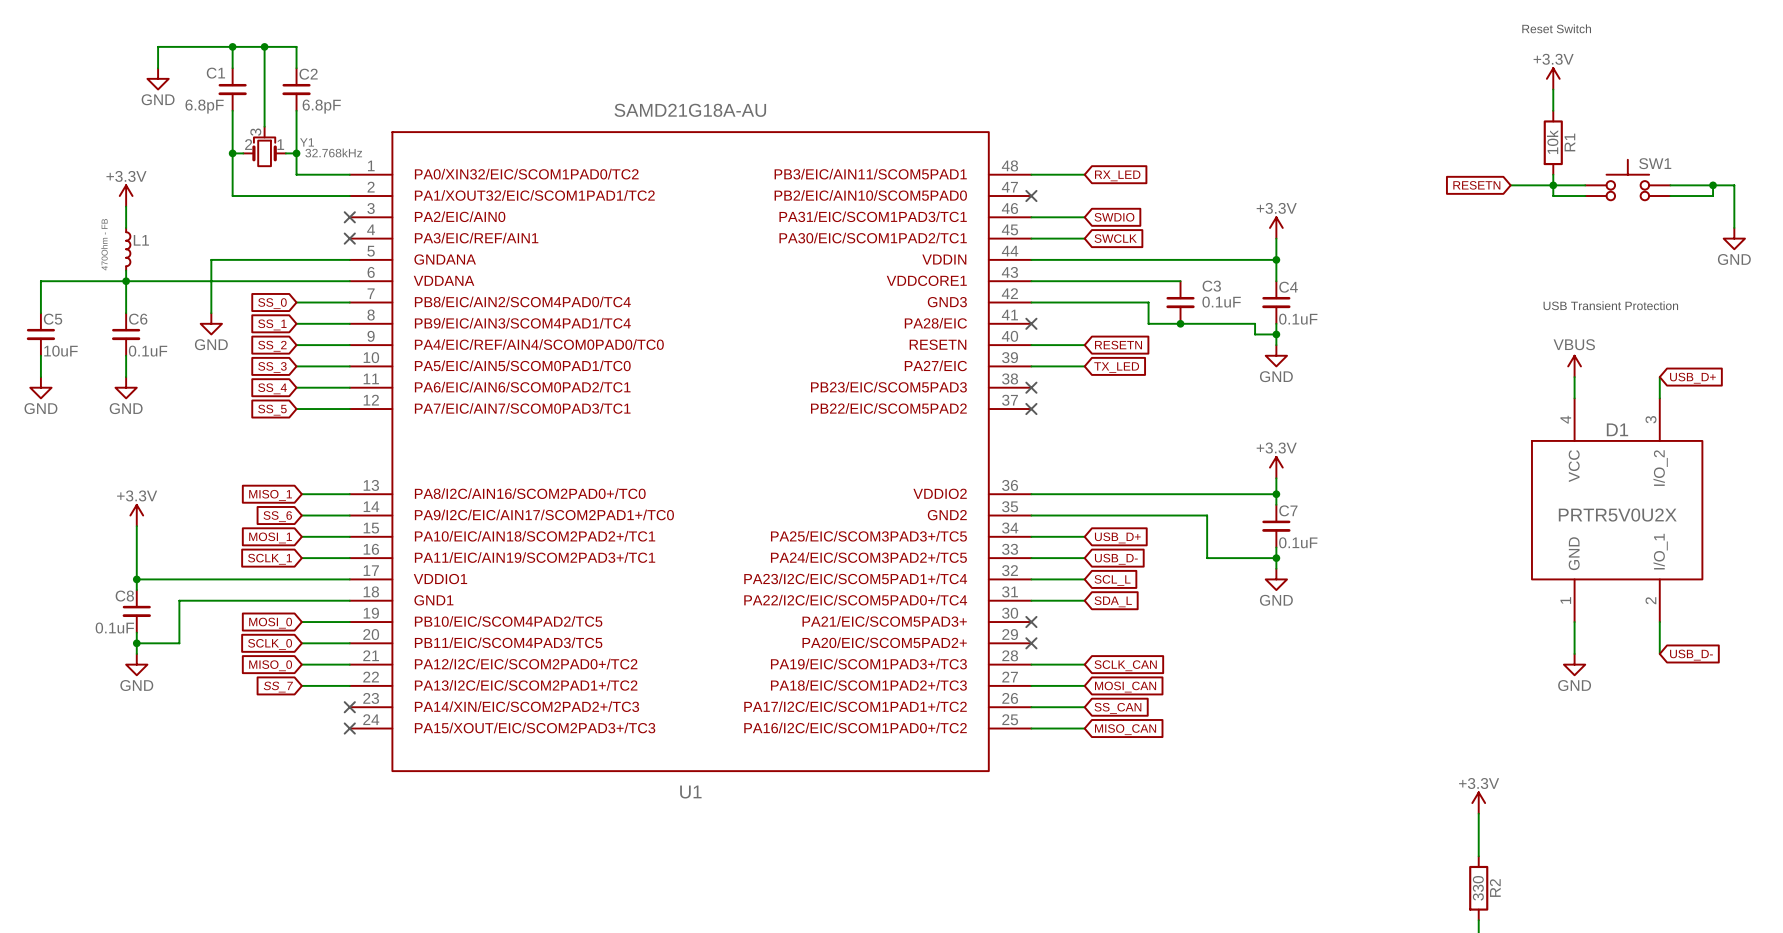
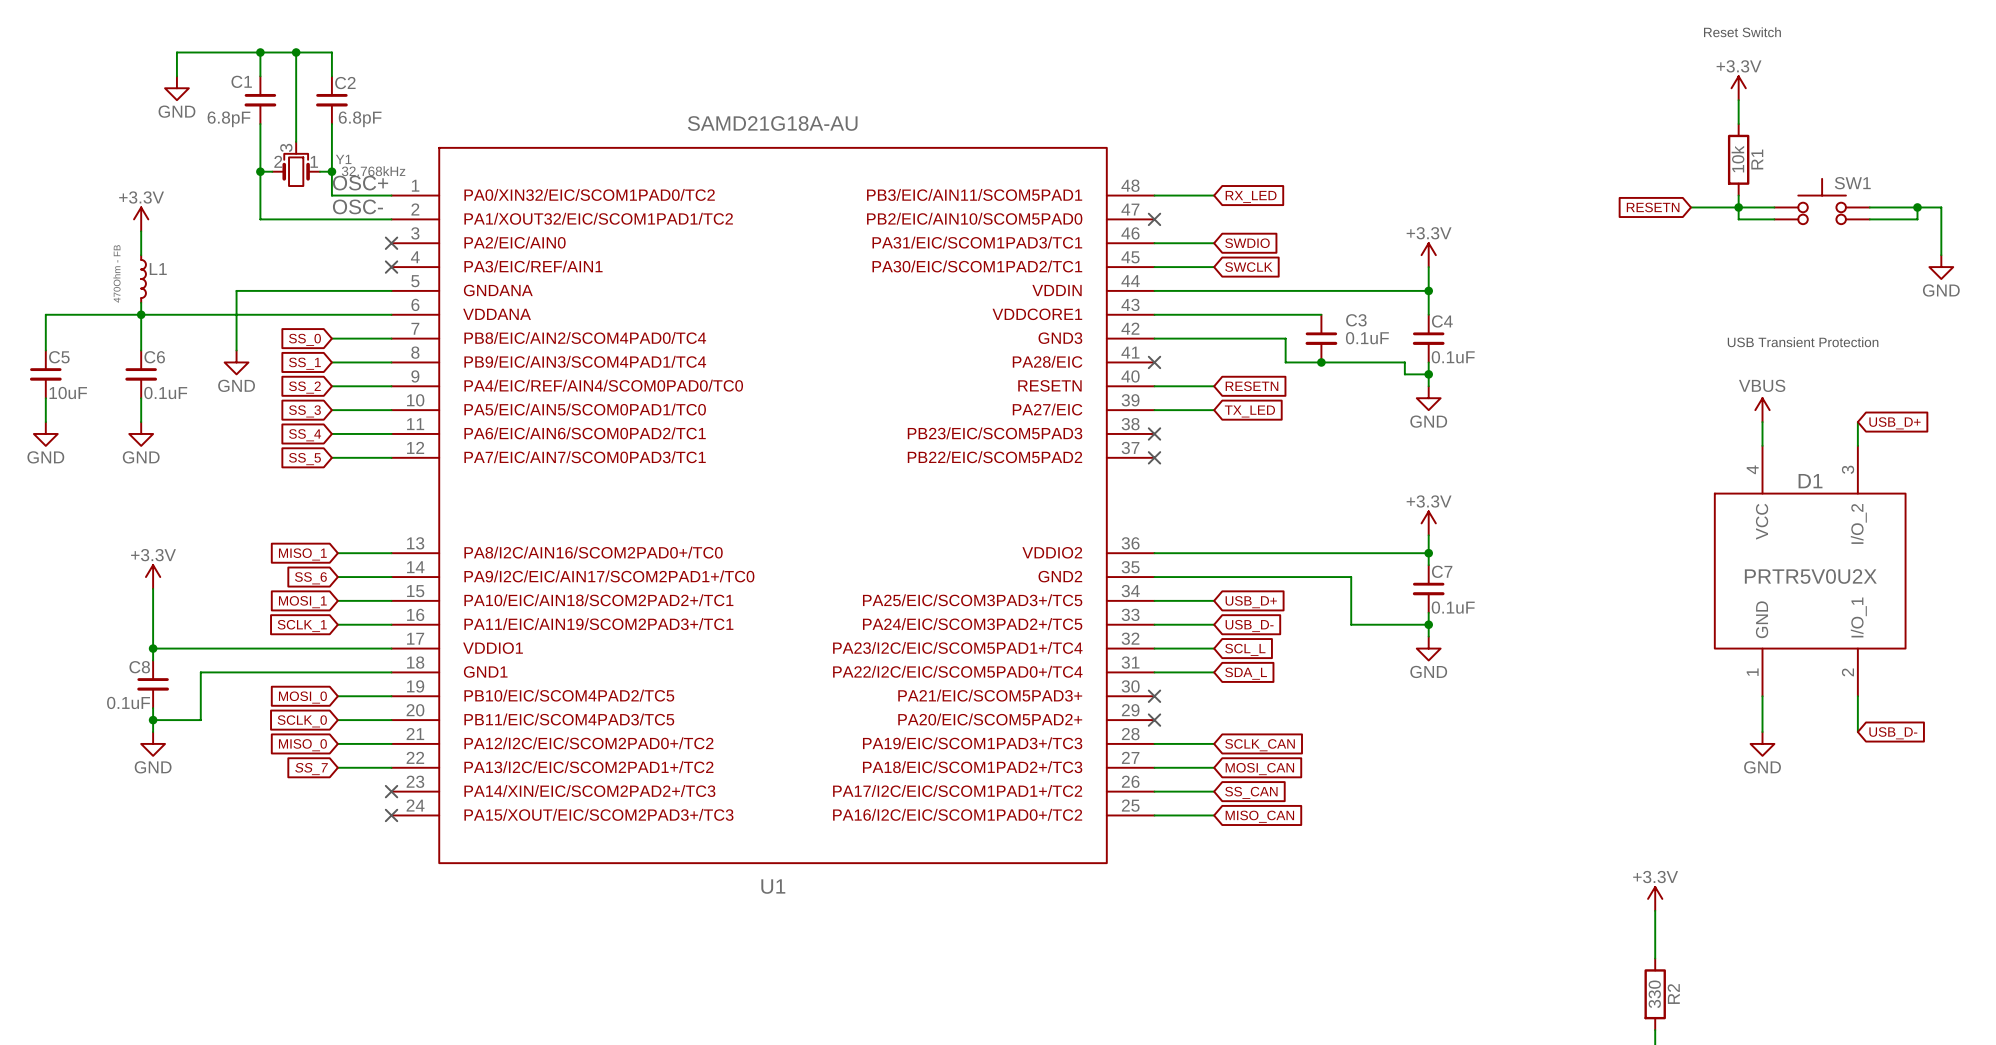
label: none -> OSC+ (360, 183)
label: none -> OSC- (357, 206)

